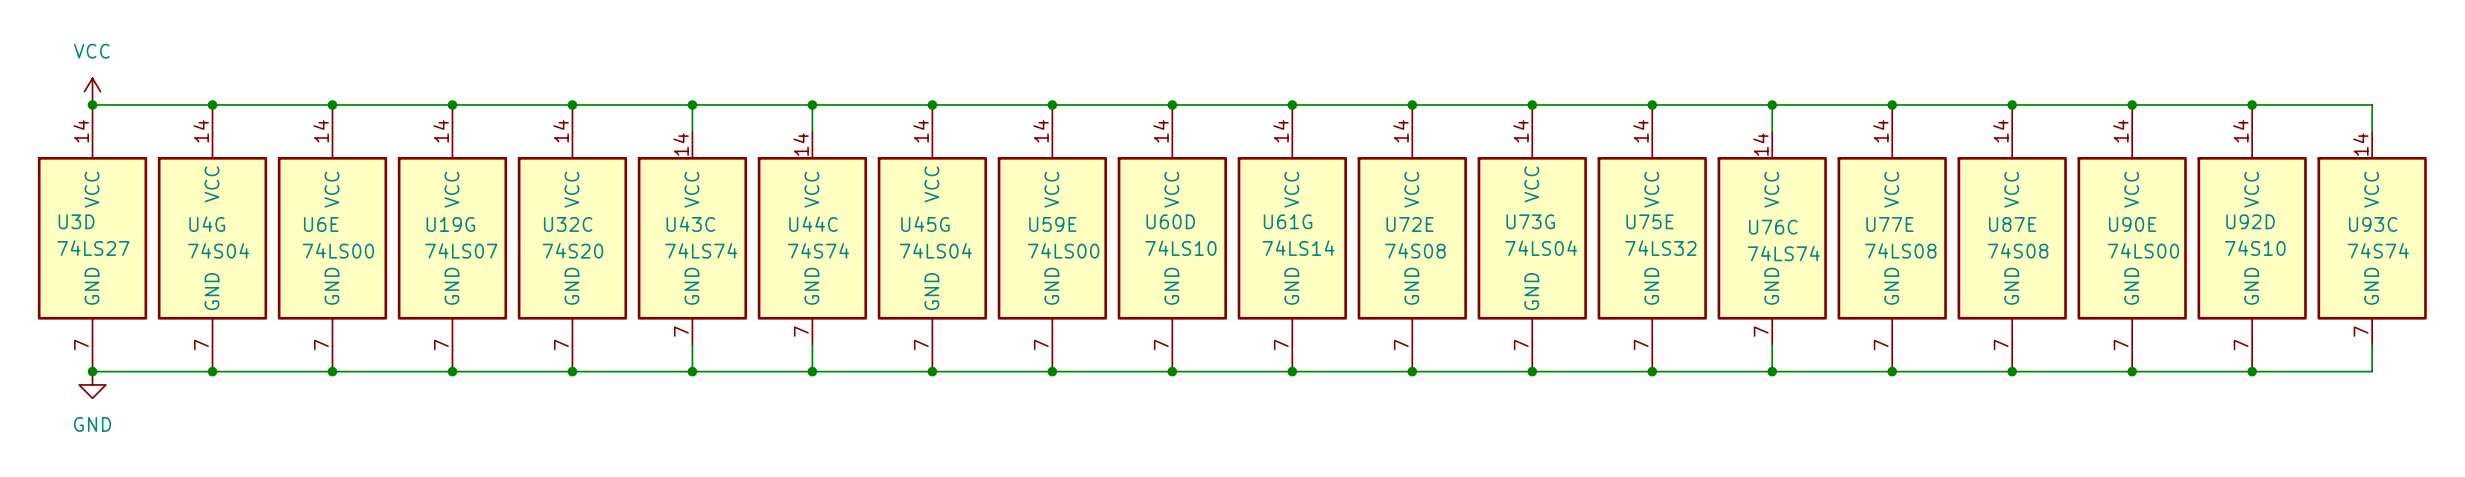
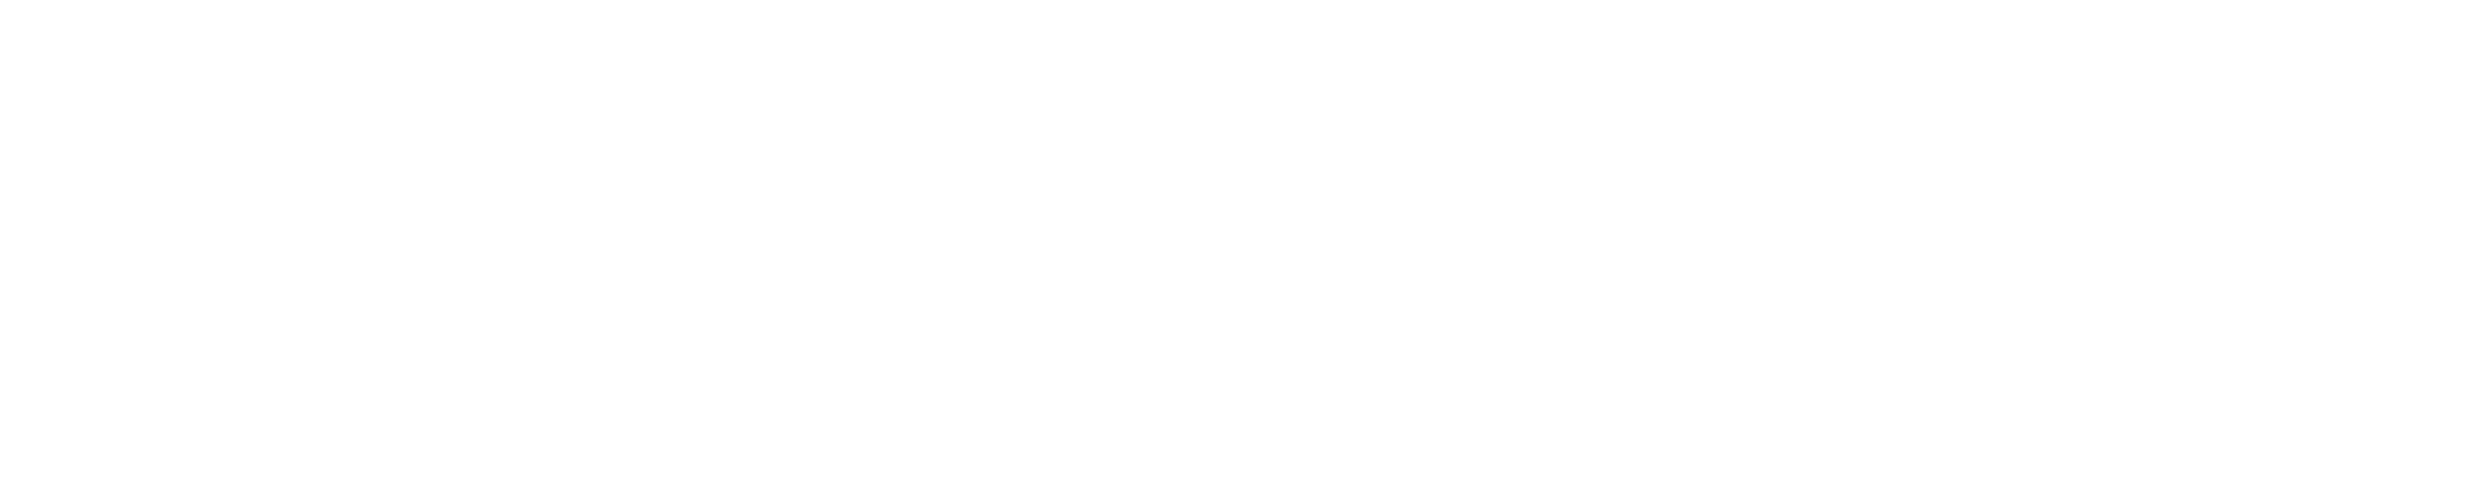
power symbol: VCC (92, 91) -> none
wire: (92, 104) (2372, 104) (2372, 131) -> none
junction: (92, 104) -> none
junction: (212, 104) -> none
junction: (332, 104) -> none
junction: (452, 104) -> none
junction: (572, 104) -> none
wire: (692, 104) (692, 131) -> none
junction: (692, 104) -> none
wire: (812, 104) (812, 131) -> none
junction: (812, 104) -> none
junction: (932, 104) -> none
junction: (1052, 104) -> none
junction: (1172, 104) -> none
junction: (1292, 104) -> none
junction: (1412, 104) -> none
junction: (1532, 104) -> none
junction: (1652, 104) -> none
wire: (1772, 104) (1772, 131) -> none
junction: (1772, 104) -> none
junction: (1892, 104) -> none
junction: (2012, 104) -> none
junction: (2132, 104) -> none
junction: (2252, 104) -> none
U3D: 74LS27 (92, 238) -> none
U4G: 74S04 (212, 238) -> none
U6E: 74LS00 (332, 238) -> none
U19G: 74LS07 (452, 238) -> none
U32C: 74S20 (572, 238) -> none
U43C: 74LS74 (692, 238) -> none
U44C: 74S74 (812, 238) -> none
U45G: 74LS04 (932, 238) -> none
U59E: 74LS00 (1052, 238) -> none
U60D: 74LS10 (1172, 238) -> none
U61G: 74LS14 (1292, 238) -> none
U72E: 74S08 (1412, 238) -> none
U73G: 74LS04 (1532, 238) -> none
U75E: 74LS32 (1652, 238) -> none
U76C: 74LS74 (1772, 238) -> none
U77E: 74LS08 (1892, 238) -> none
U87E: 74S08 (2012, 238) -> none
U90E: 74LS00 (2132, 238) -> none
U92D: 74S10 (2252, 238) -> none
U93C: 74S74 (2372, 238) -> none
wire: (692, 344) (692, 371) -> none
wire: (812, 344) (812, 371) -> none
wire: (1772, 344) (1772, 371) -> none
wire: (2372, 344) (2372, 371) (92, 371) -> none
junction: (92, 371) -> none
junction: (212, 371) -> none
junction: (332, 371) -> none
junction: (452, 371) -> none
junction: (572, 371) -> none
junction: (692, 371) -> none
junction: (812, 371) -> none
junction: (932, 371) -> none
junction: (1052, 371) -> none
junction: (1172, 371) -> none
junction: (1292, 371) -> none
junction: (1412, 371) -> none
junction: (1532, 371) -> none
junction: (1652, 371) -> none
junction: (1772, 371) -> none
junction: (1892, 371) -> none
junction: (2012, 371) -> none
junction: (2132, 371) -> none
junction: (2252, 371) -> none
power symbol: GND (92, 384) -> none

